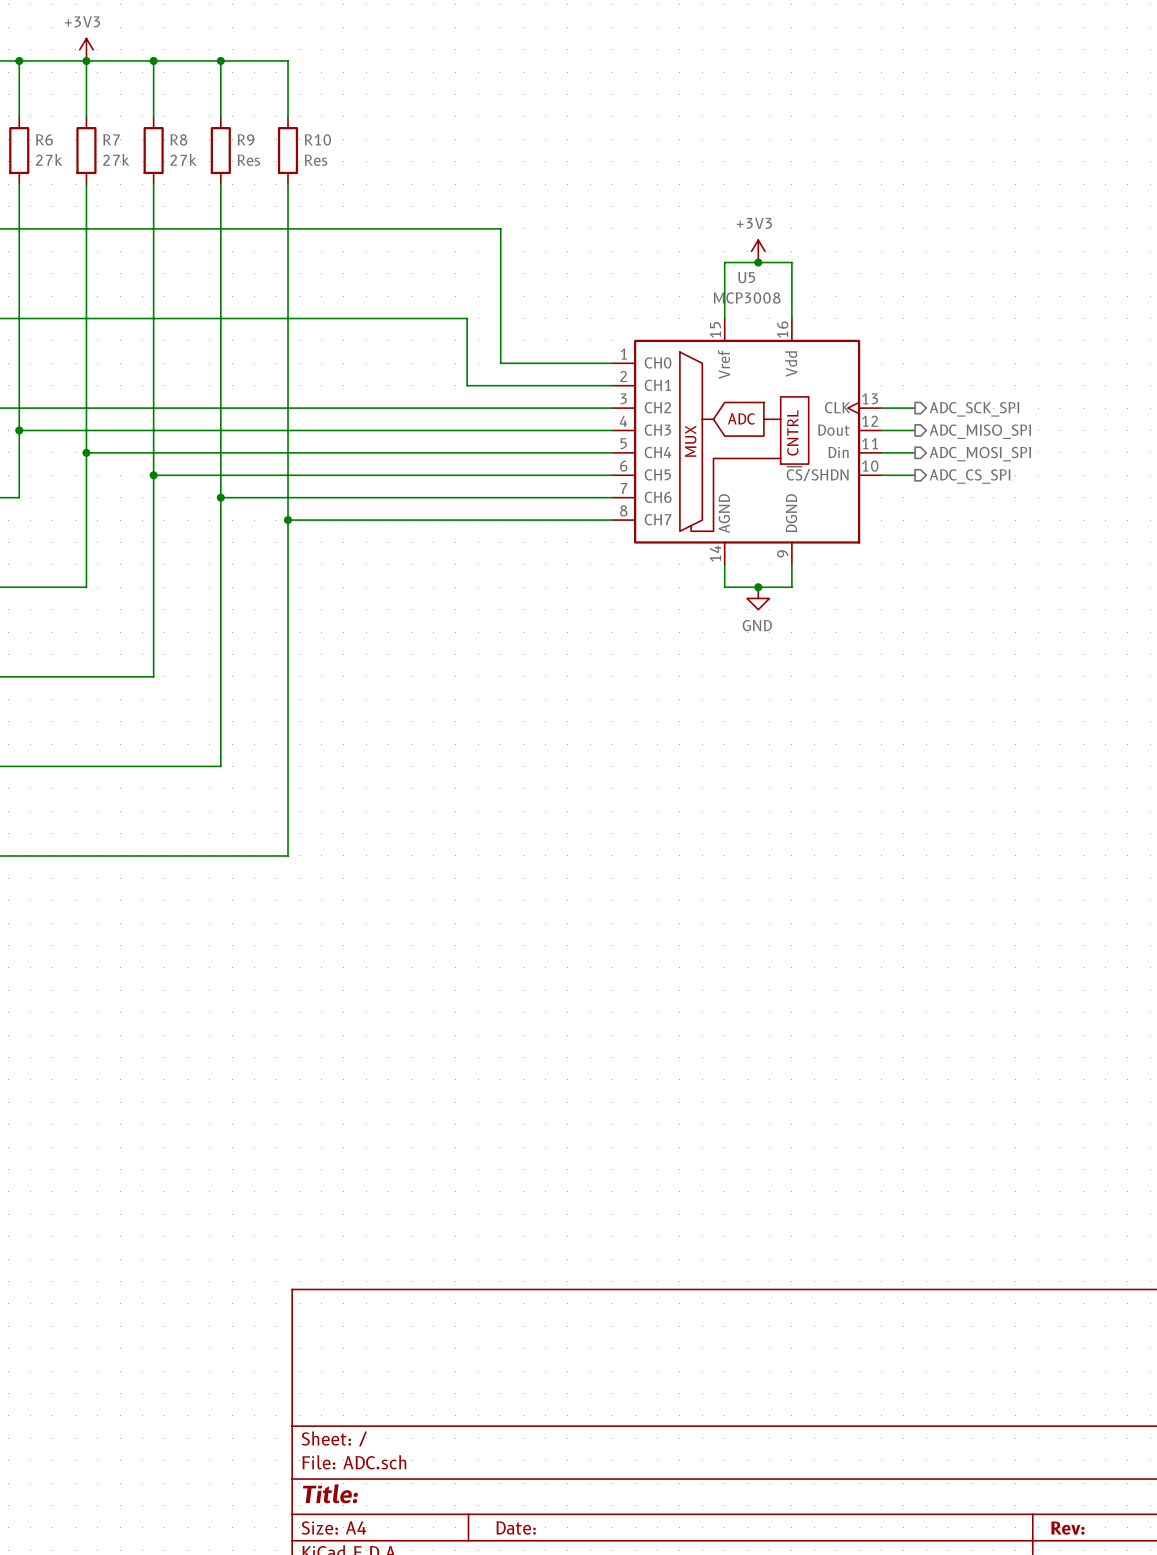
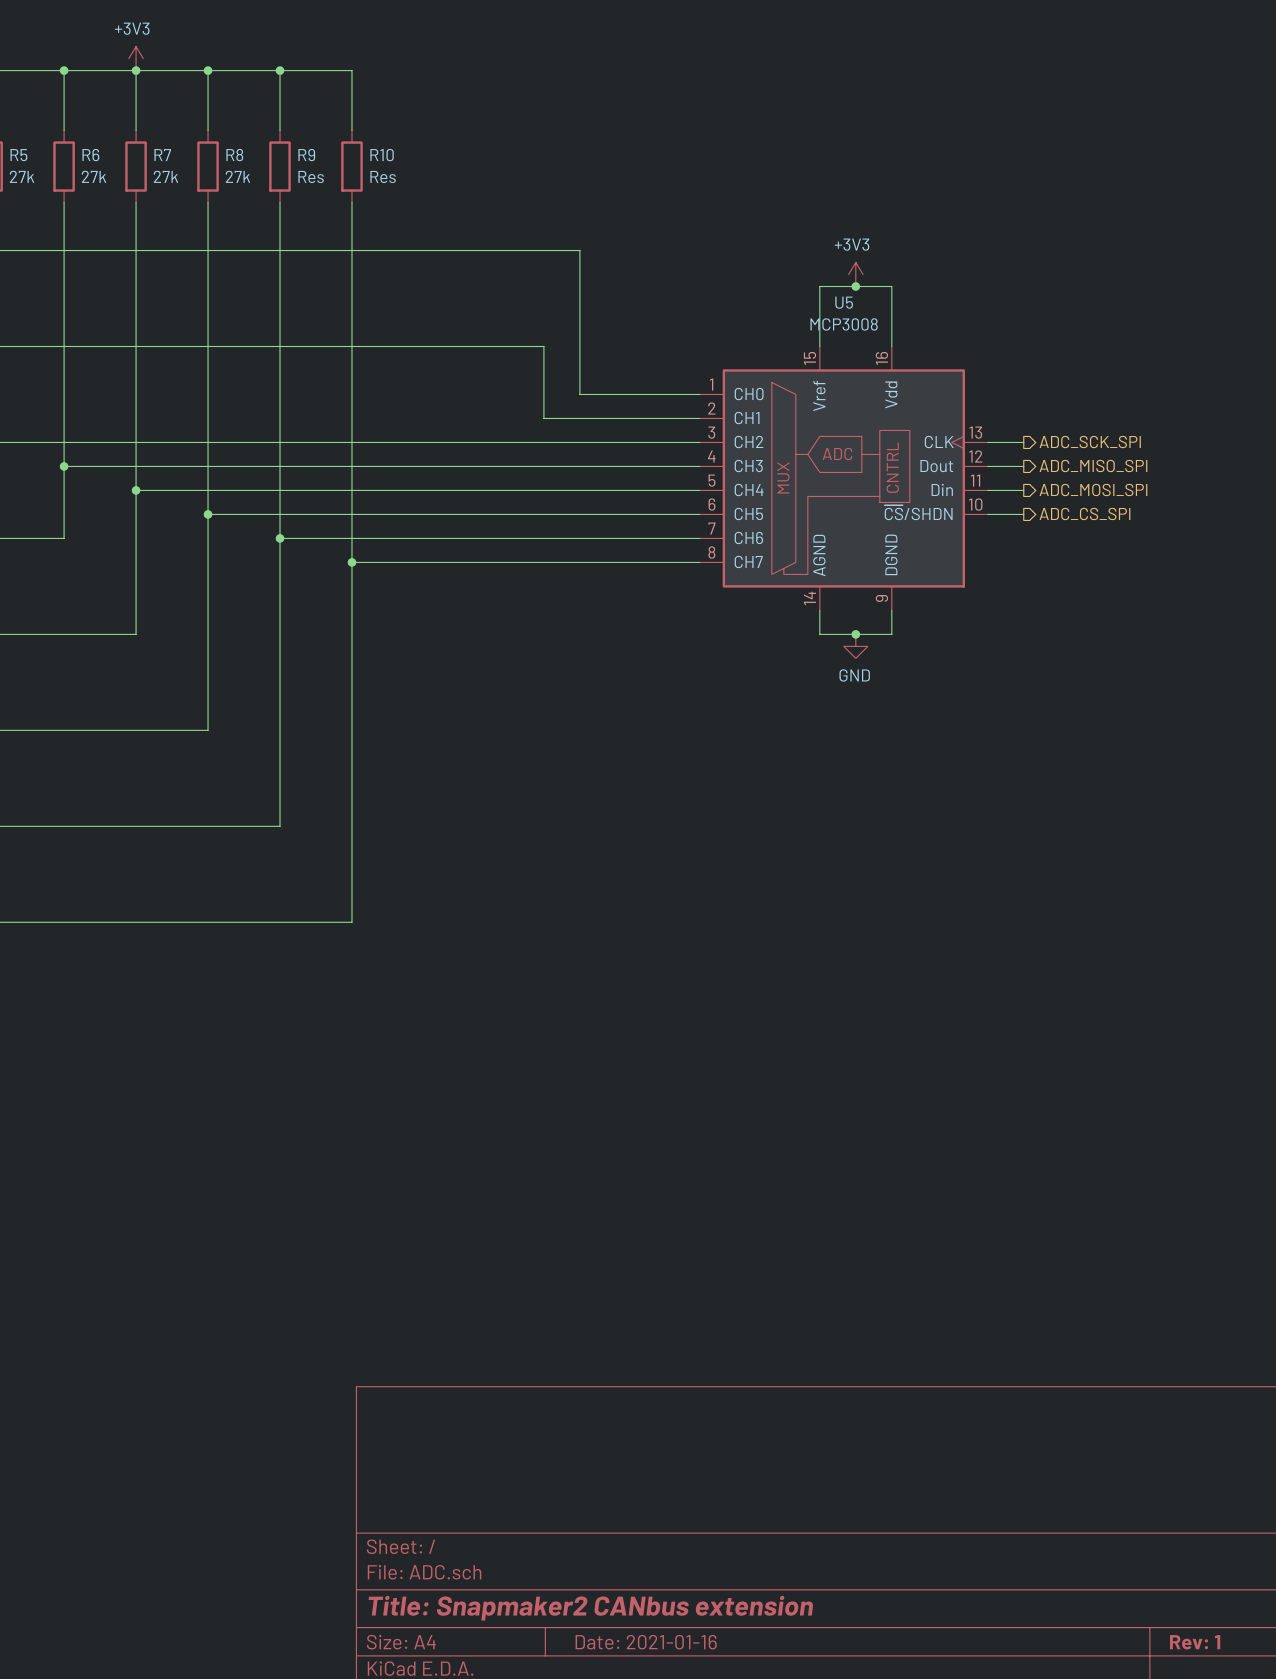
title block: Title: (330, 1493) -> Title: Snapmaker2 CANbus extension (590, 1608)
title block: Date: (516, 1528) -> Date: 2021-01-16 (646, 1642)
title block: Rev: (1067, 1528) -> Rev: 1 (1195, 1642)

